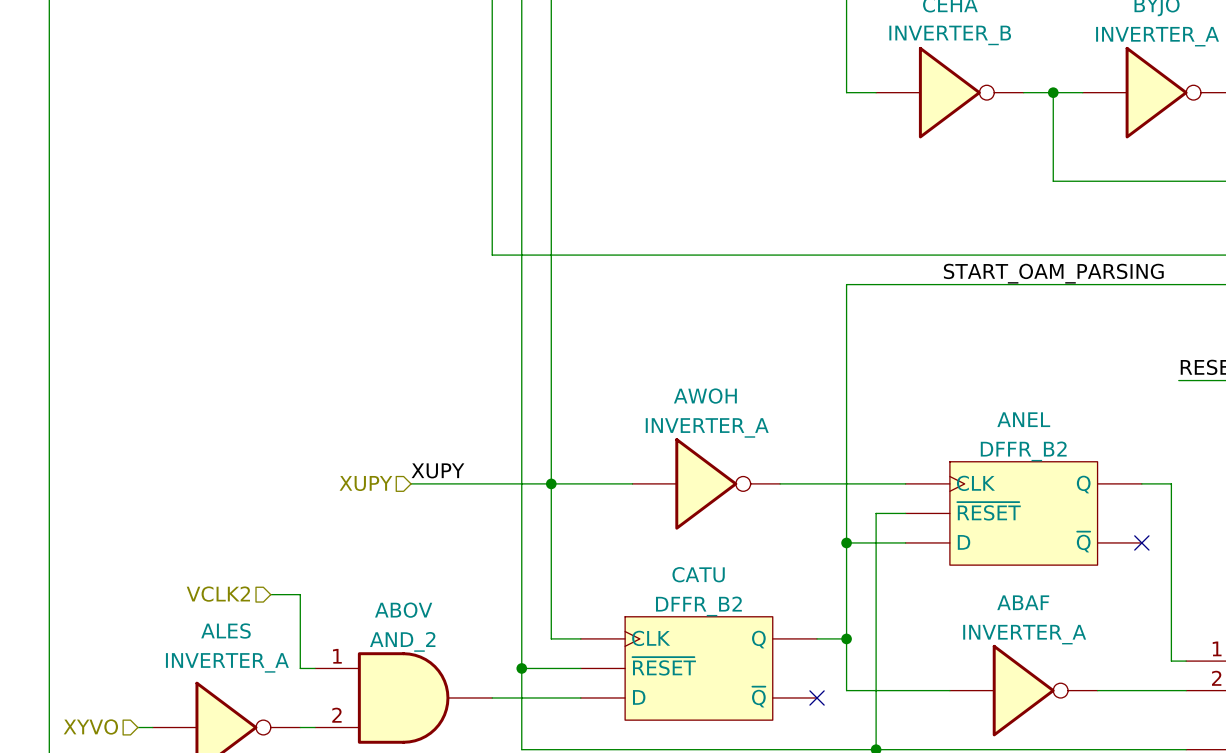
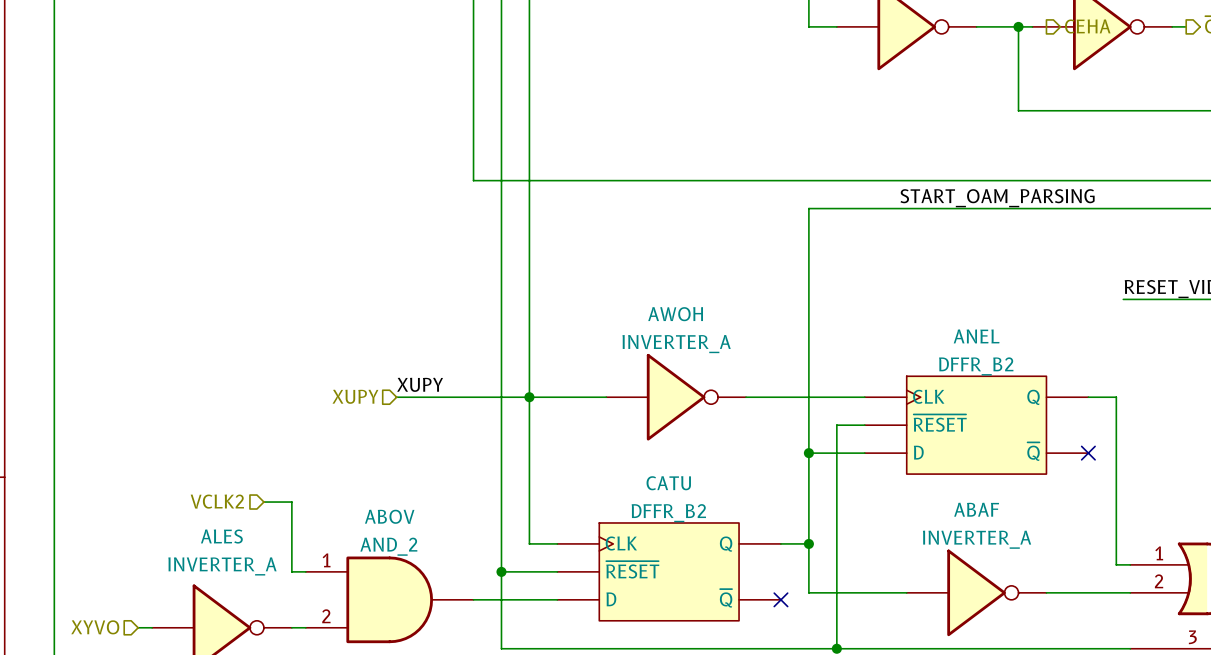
wire: (1053, 92) (1053, 181) (1068, 181) -> (1018, 26) (1018, 110)
junction position: (1053, 92) -> (1018, 26)
hierarchical label: none -> CEHA (1087, 26)

